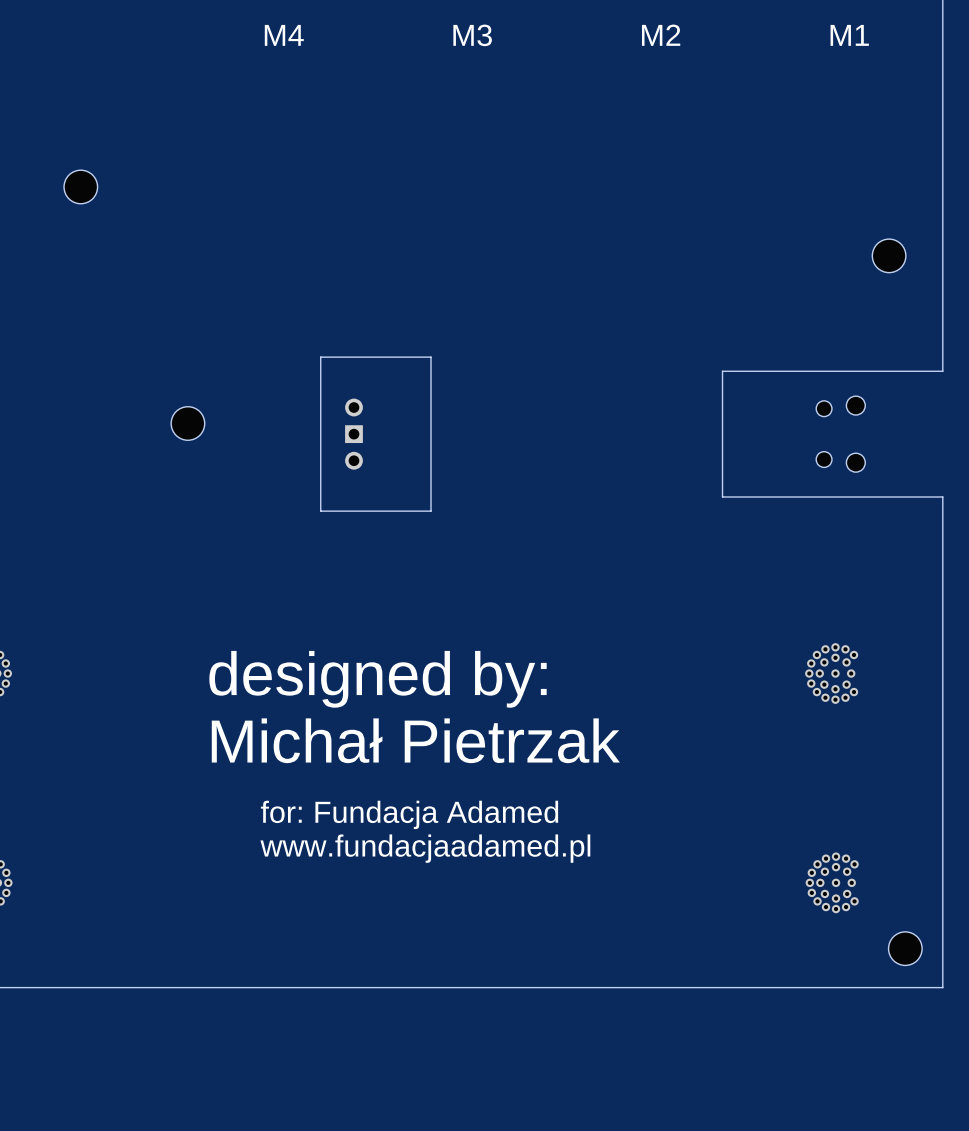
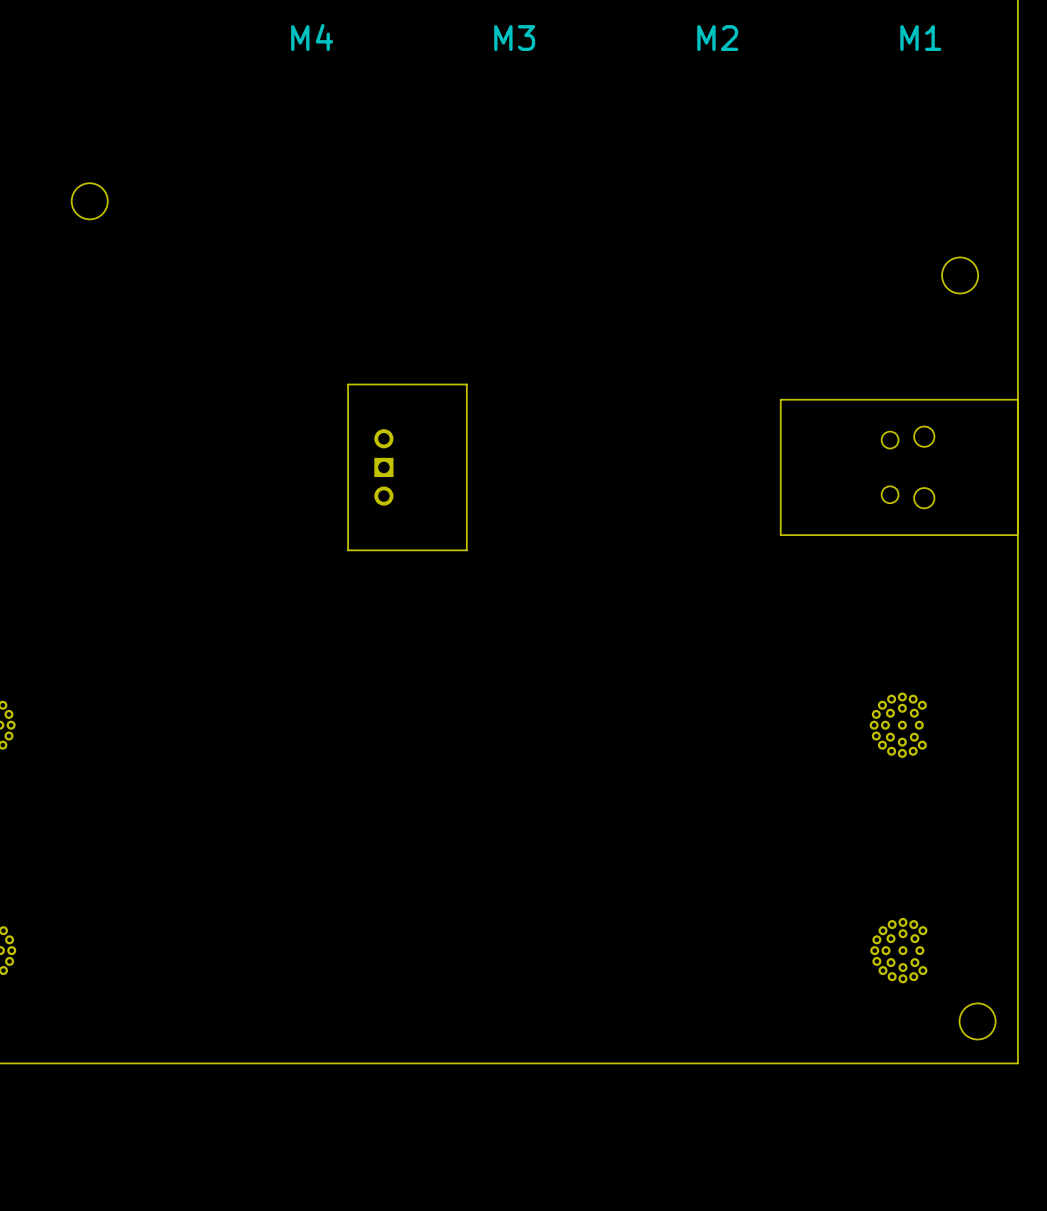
board edge: none -> (1017, 399) (1017, 535)
part: (187, 423) -> none
text: designed by: (378, 679) -> none
text: Michał Pietrzak (415, 740) -> none
text: for: Fundacja Adamed (409, 814) -> none
text: www.fundacjaadamed.pl (425, 848) -> none

